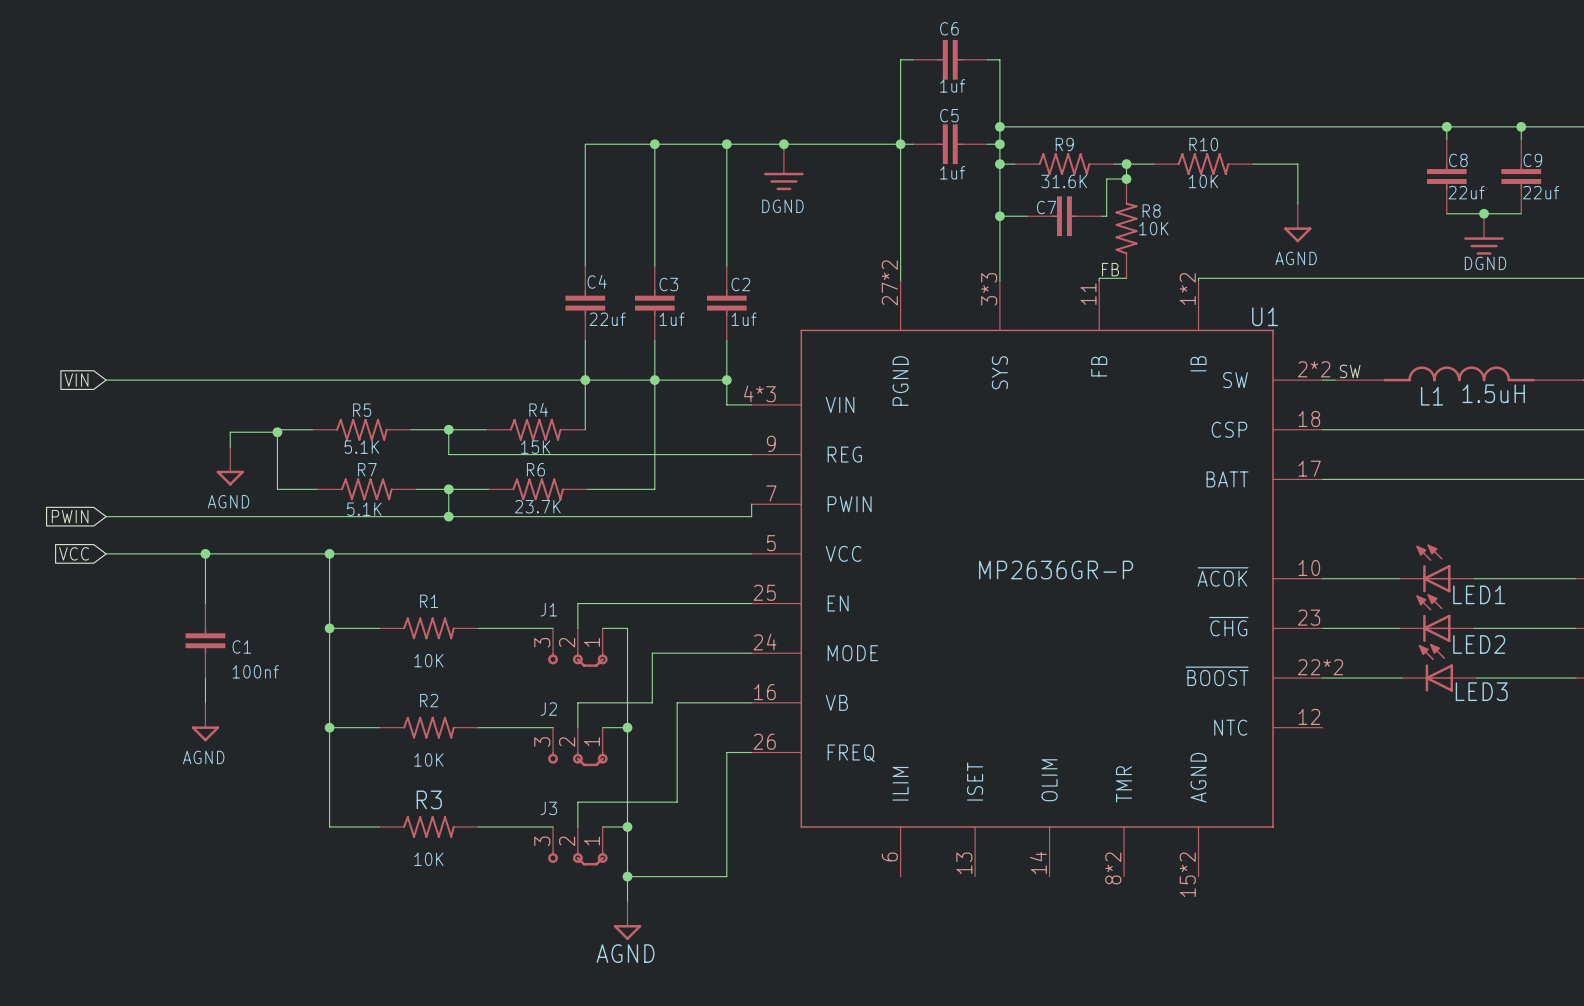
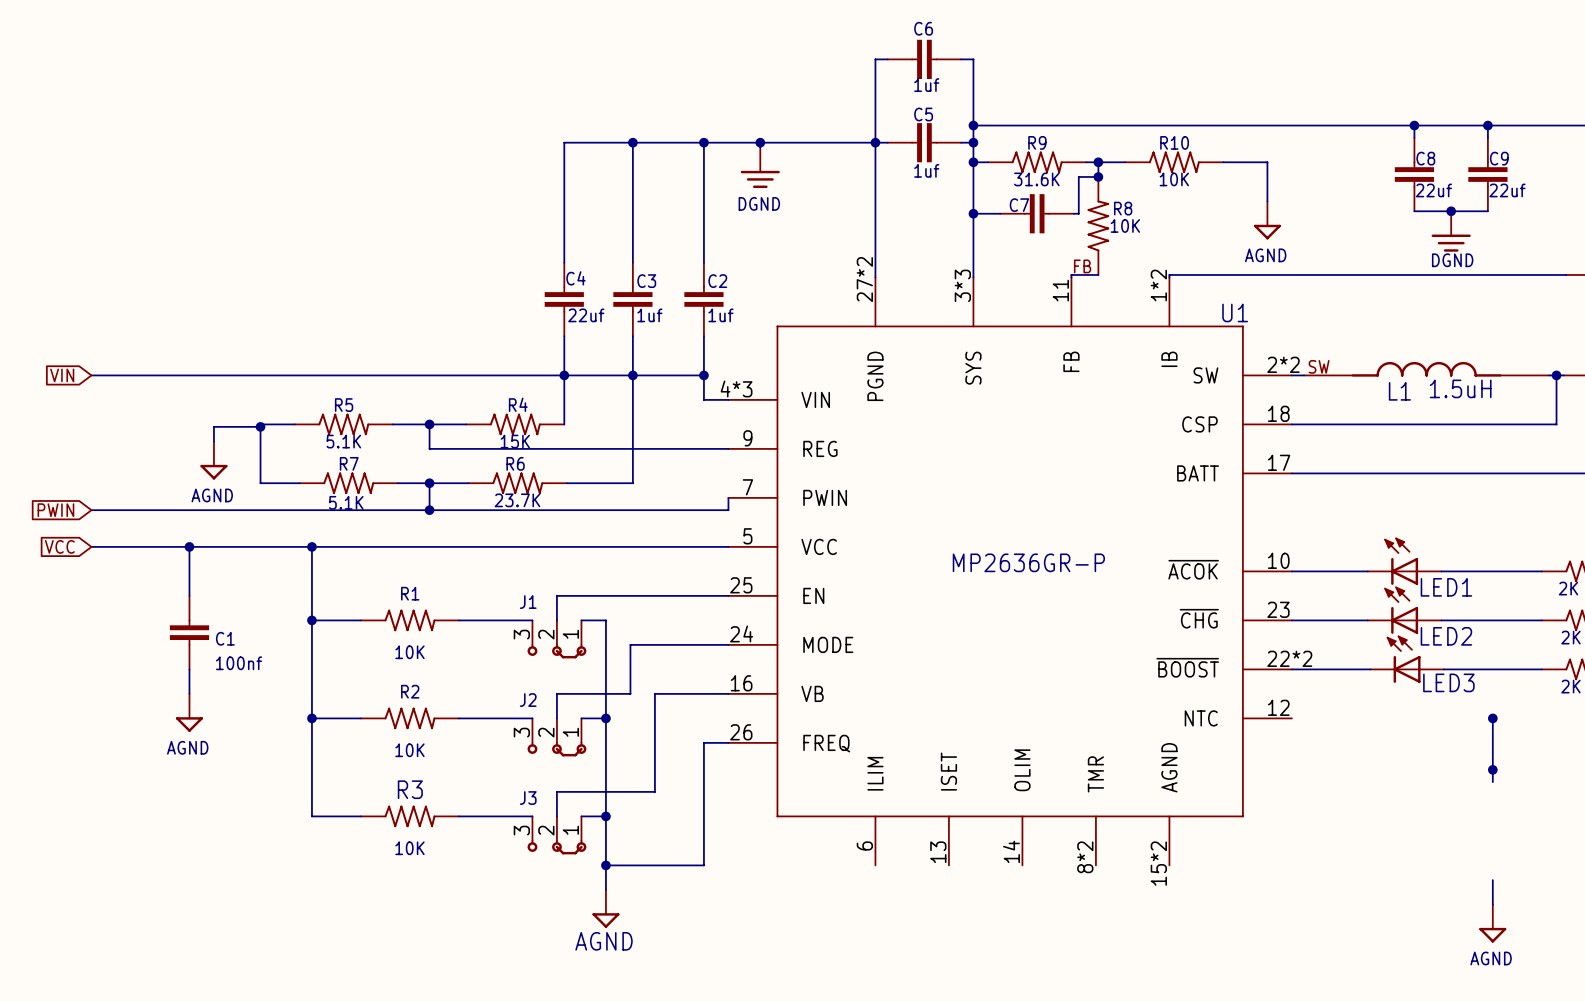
wire: none -> (1492, 718) (1492, 782)
junction: none -> (1492, 718)
junction: none -> (1492, 769)
wire: none -> (1492, 880) (1492, 904)
power symbol: none -> AGND (1492, 923)

